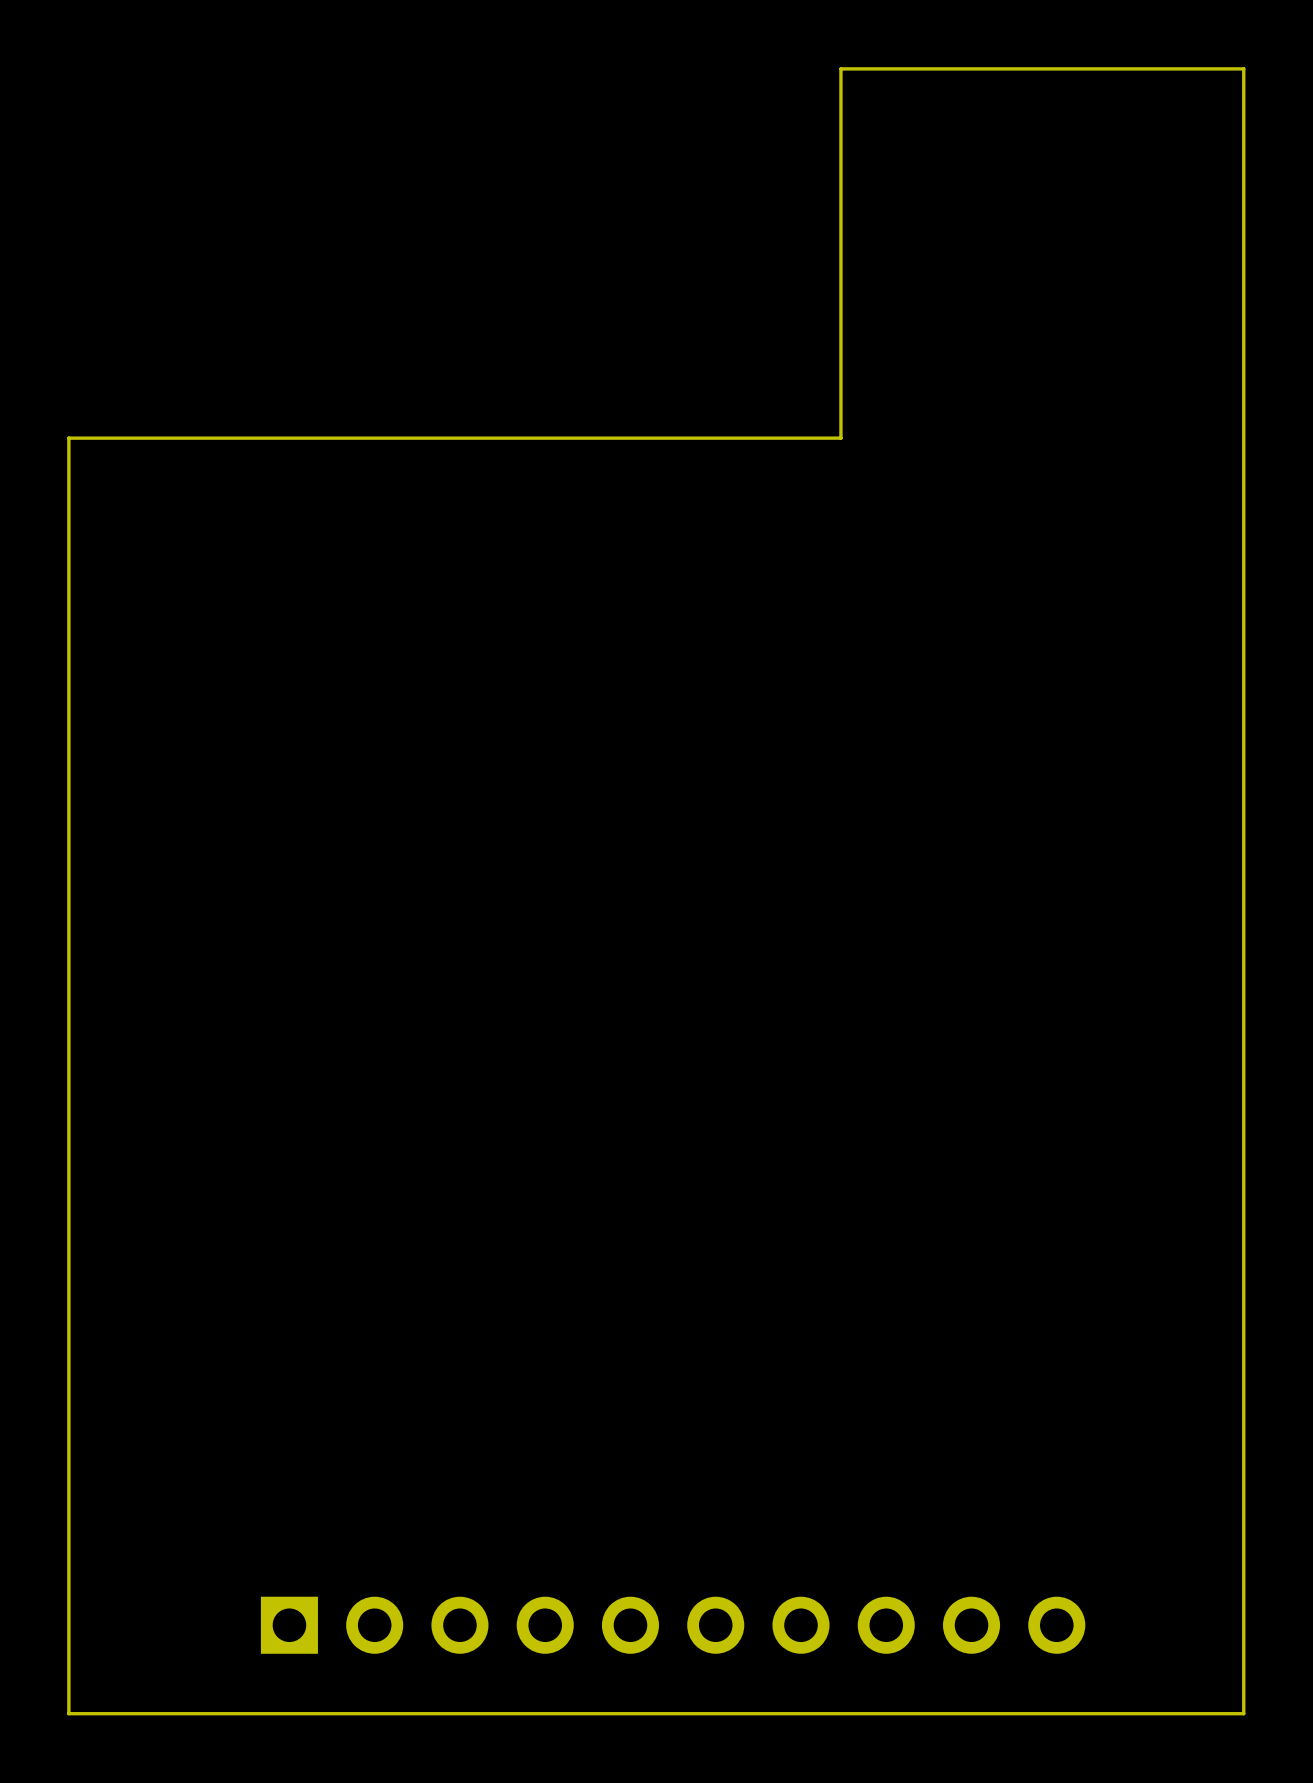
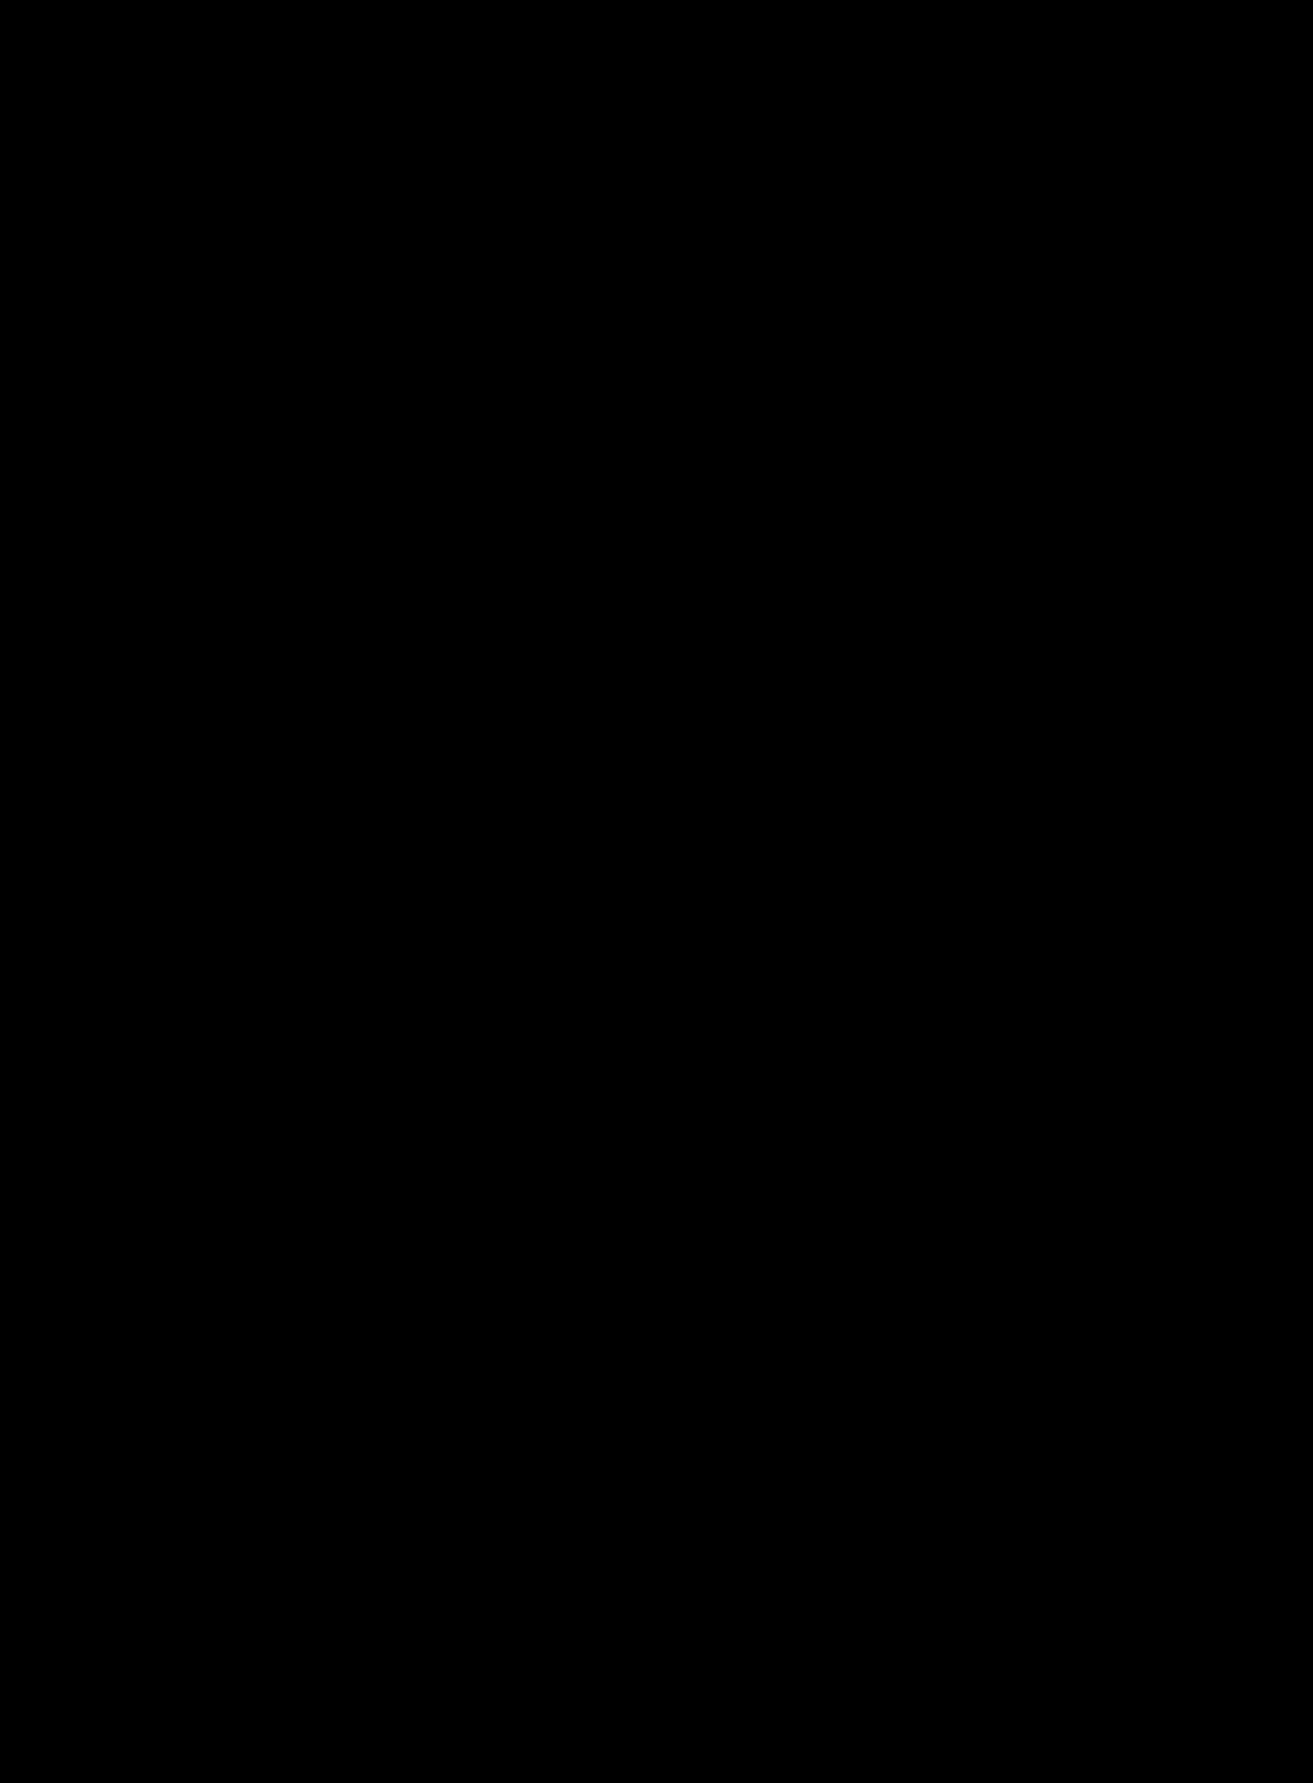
board edge: (1243, 68) (840, 68) (840, 438) (68, 438) (68, 1713) (1243, 1713) (1243, 68) -> none
part: (673, 1625) -> none

